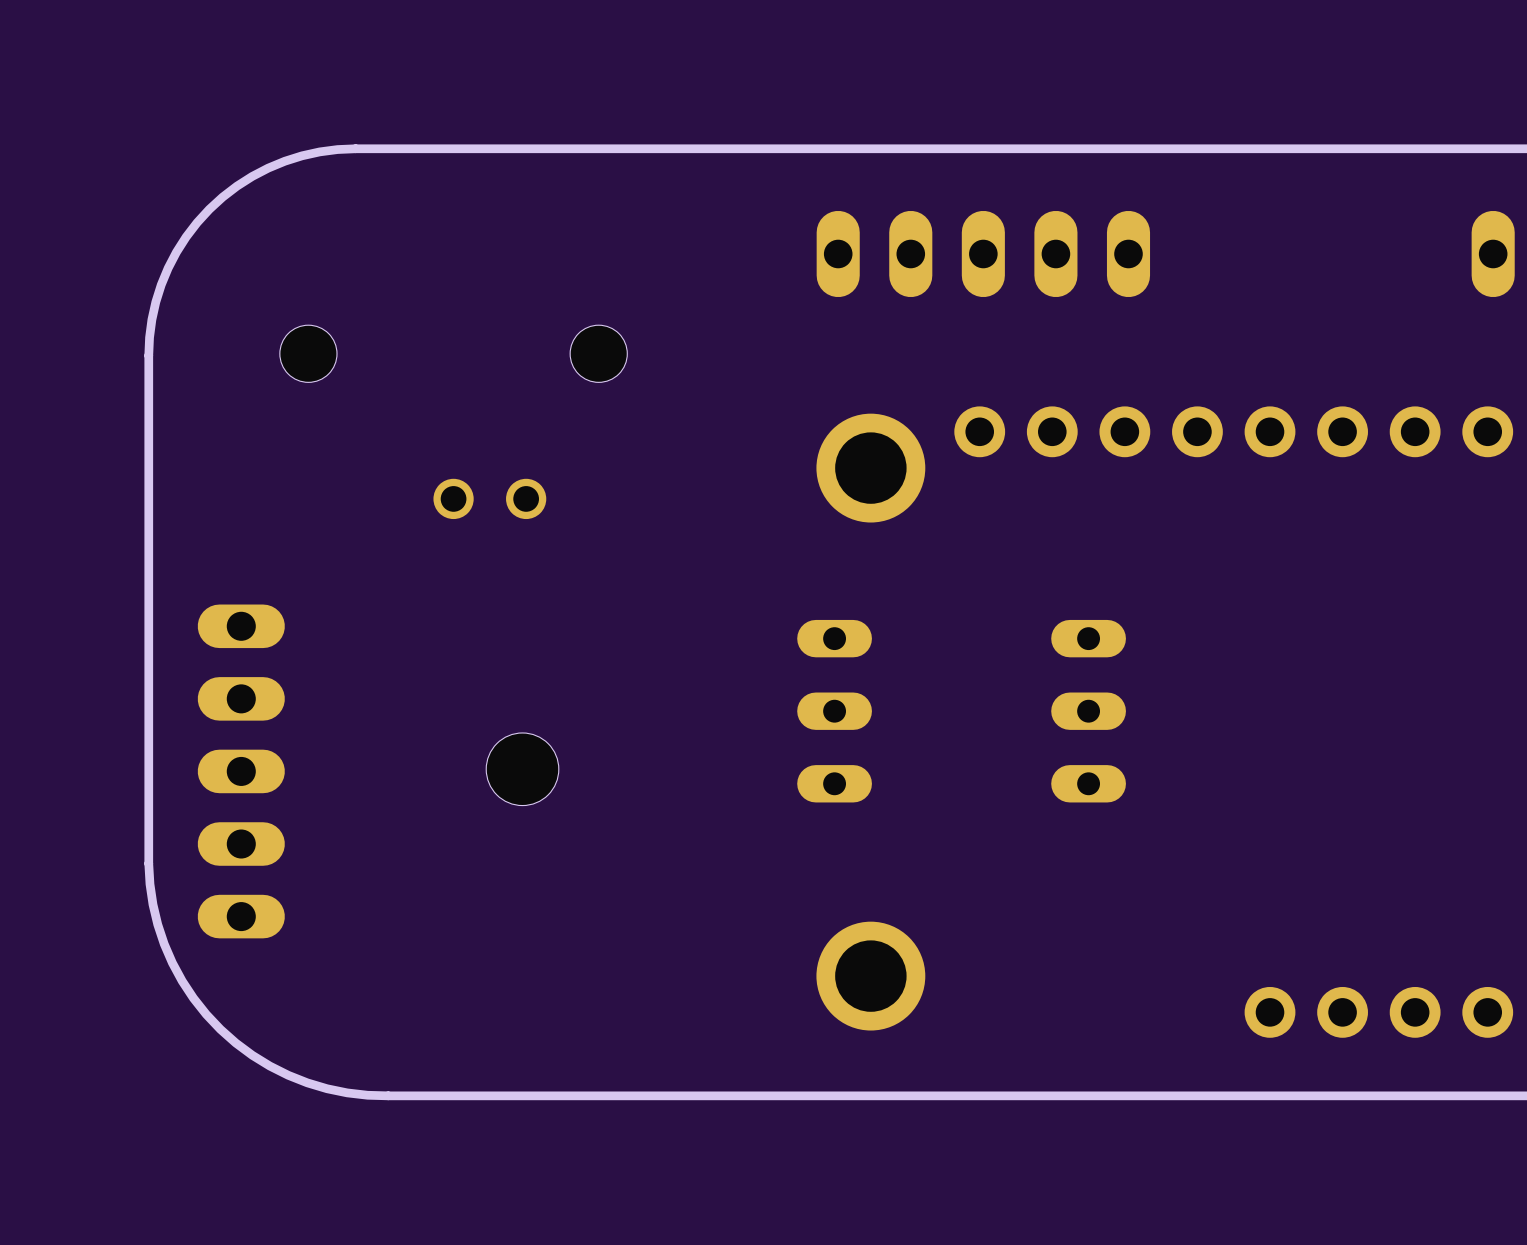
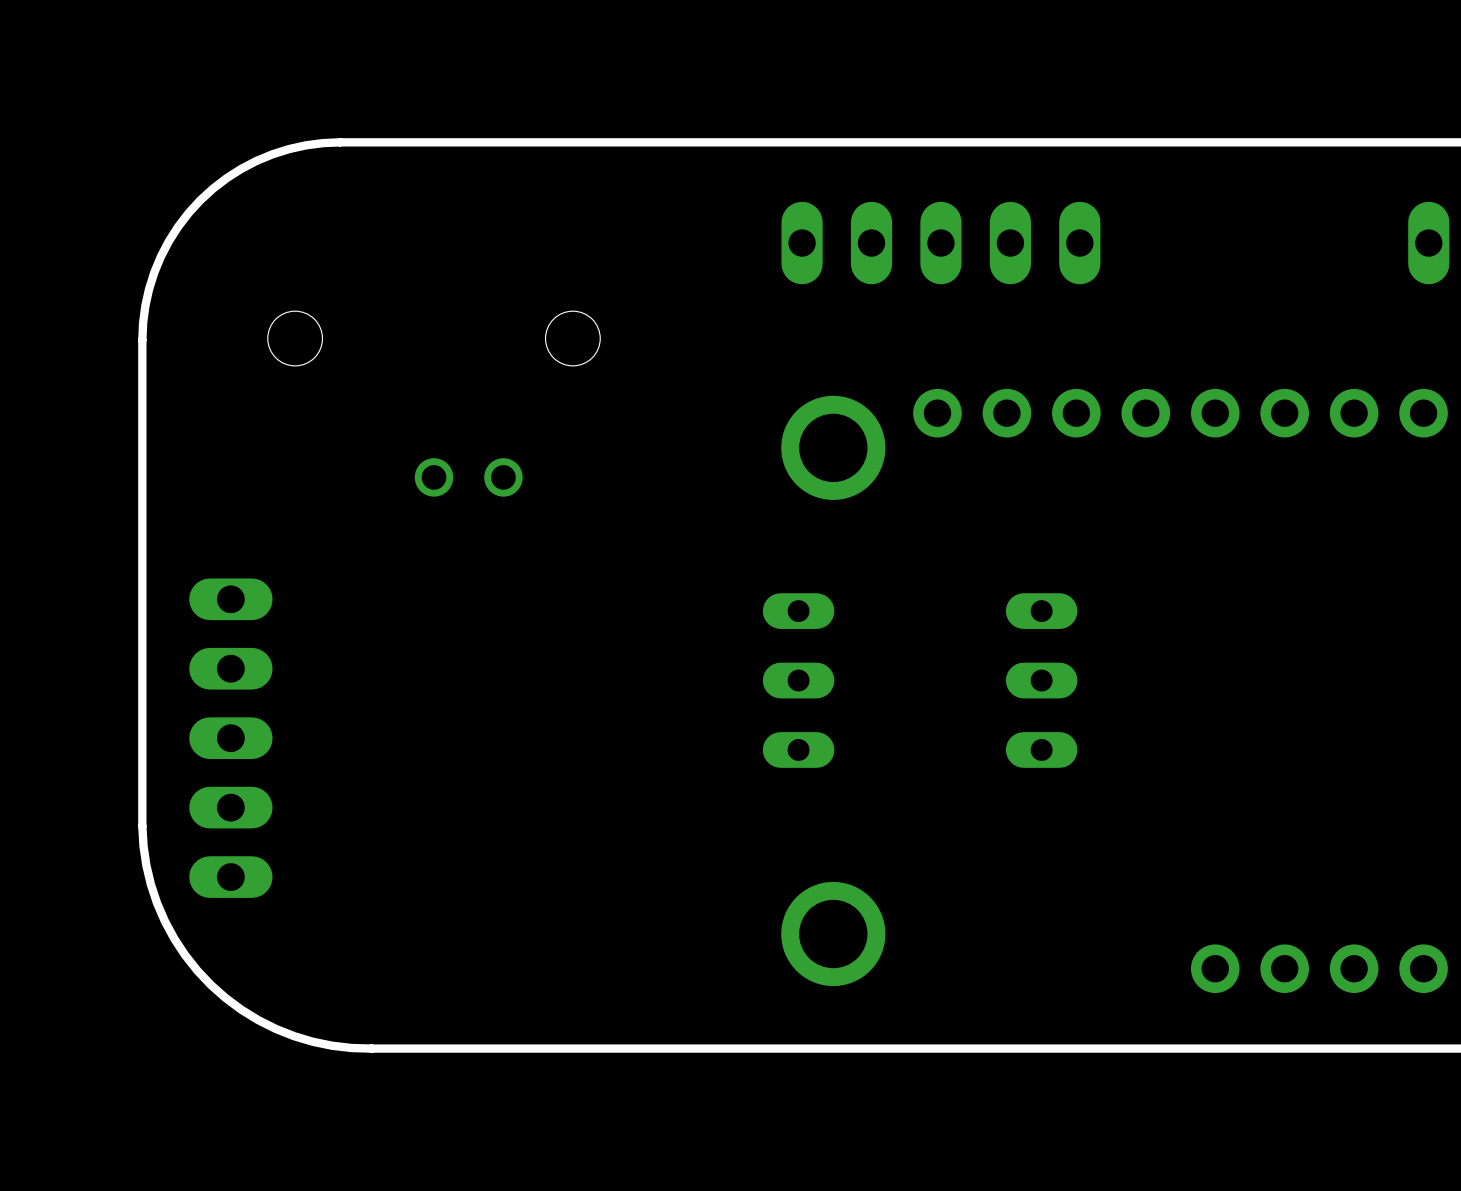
hole: (522, 769) -> none

